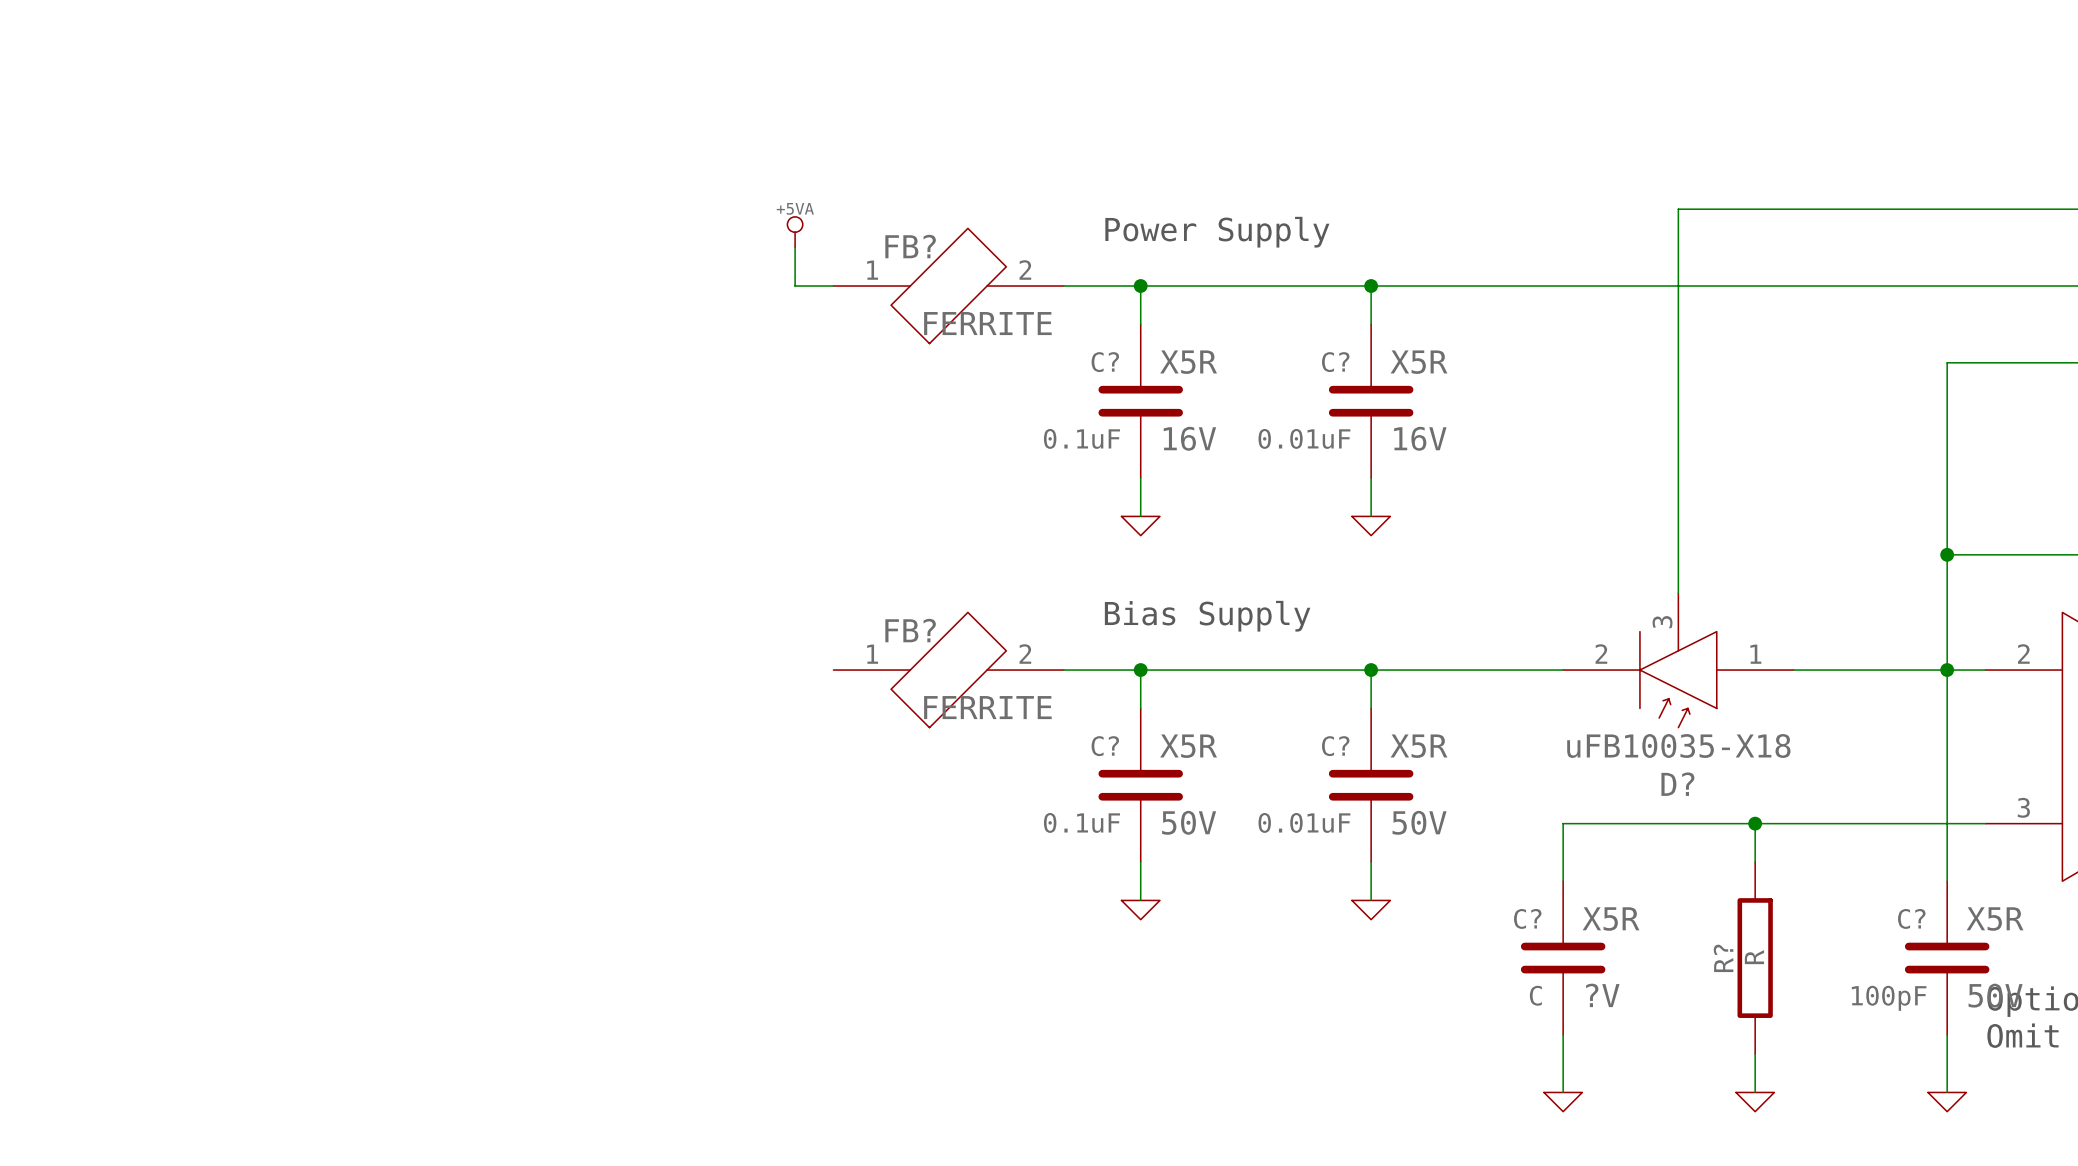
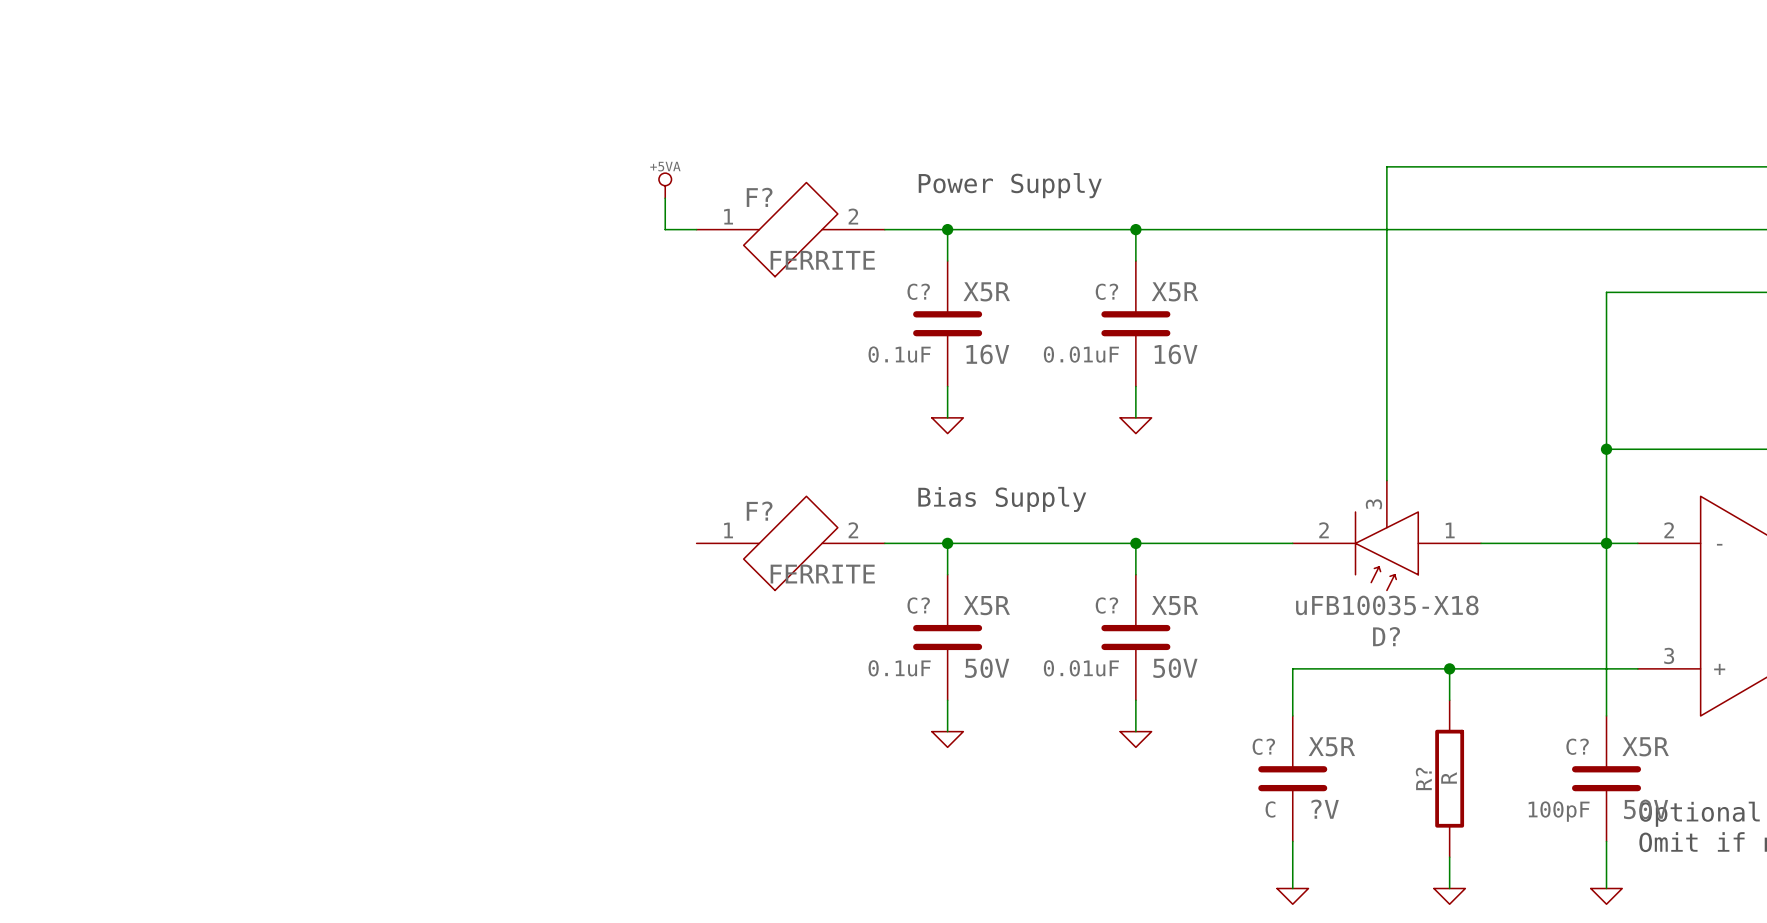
FB? name: FB? (910, 246) -> F? (759, 197)
FB? name: FB? (910, 630) -> F? (759, 511)

